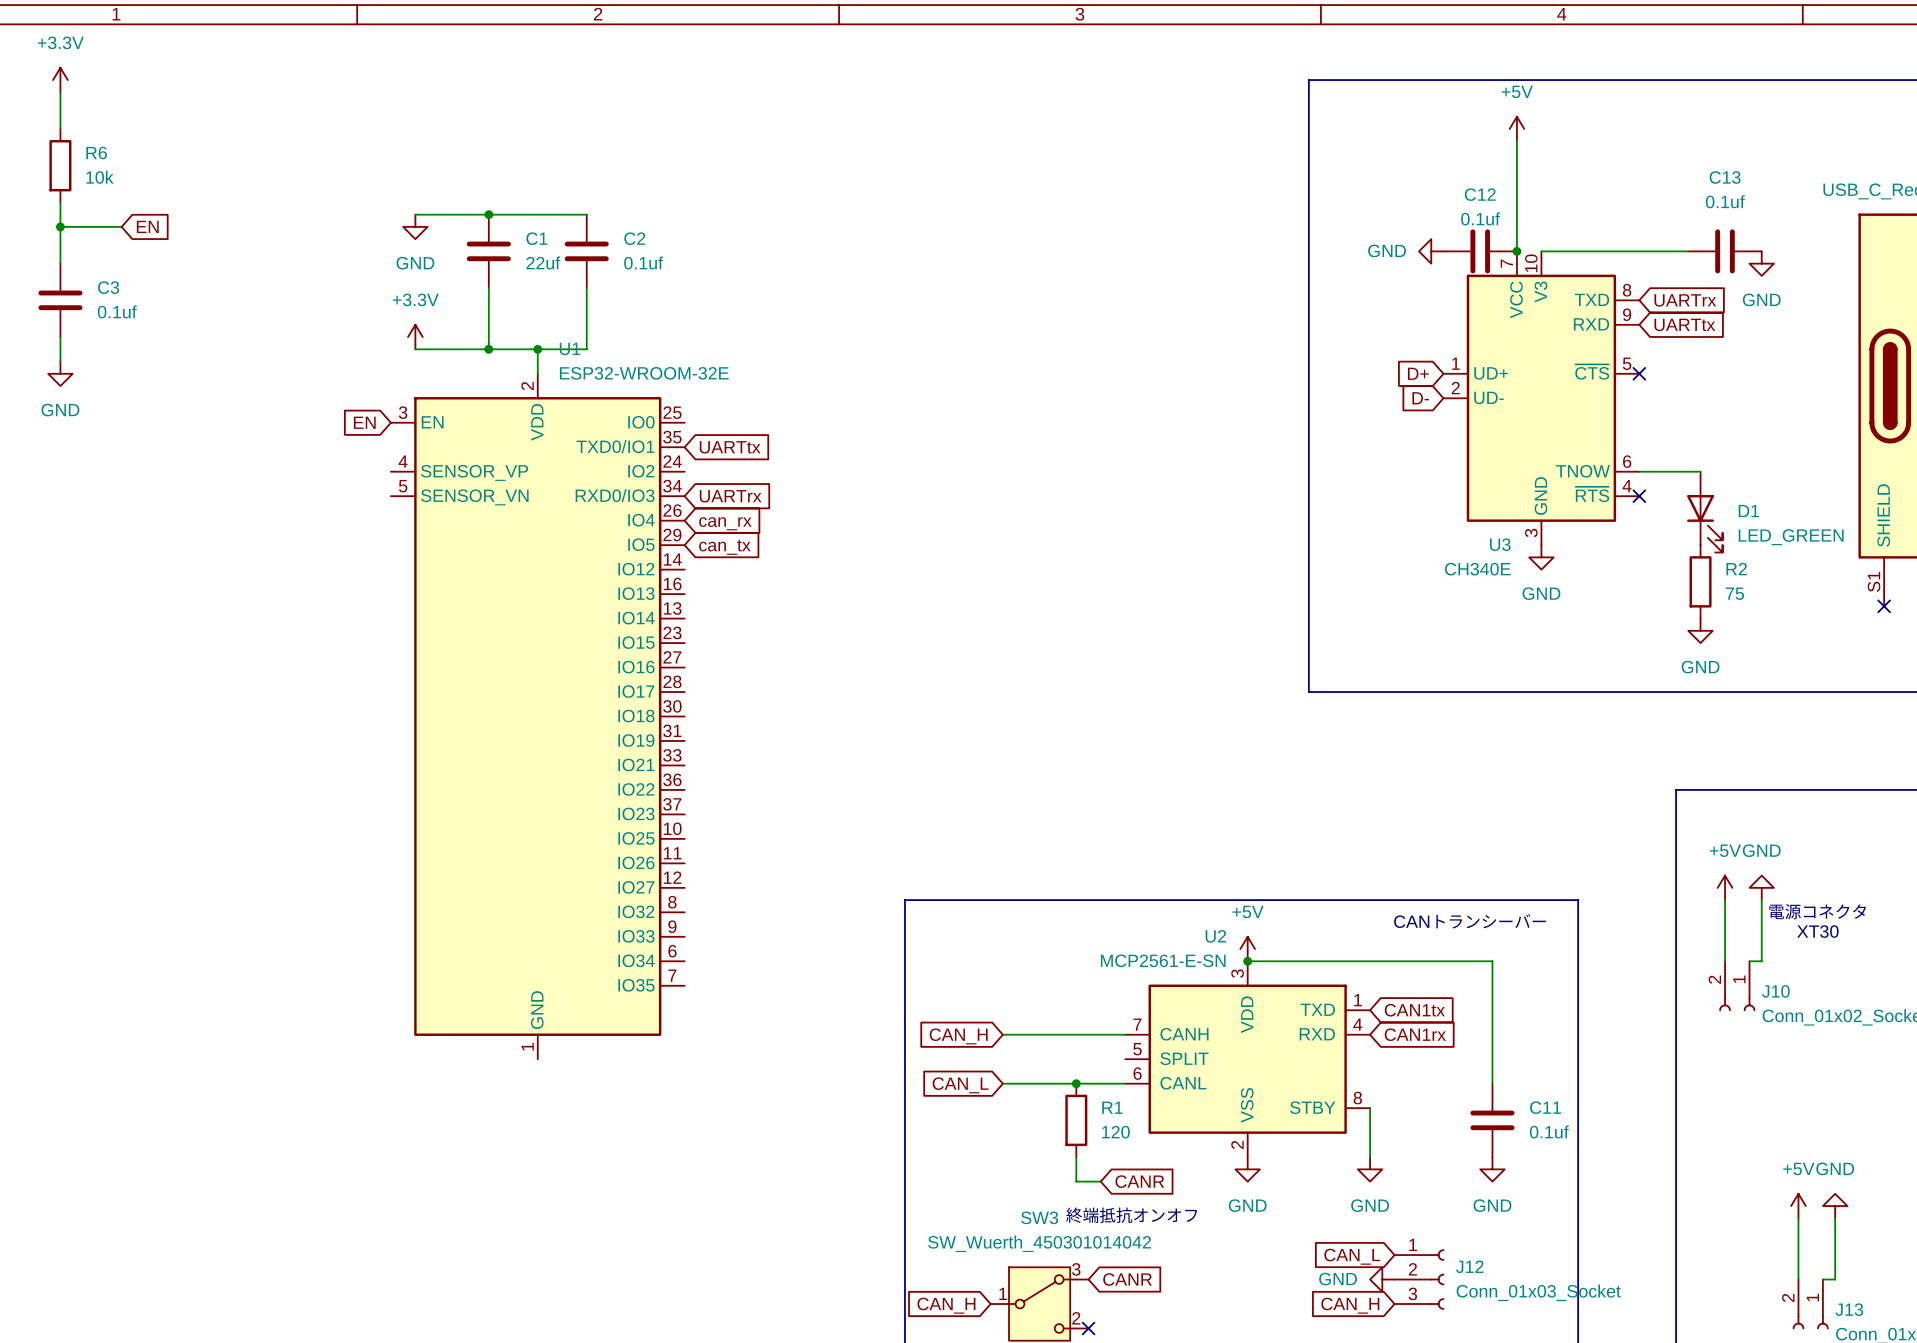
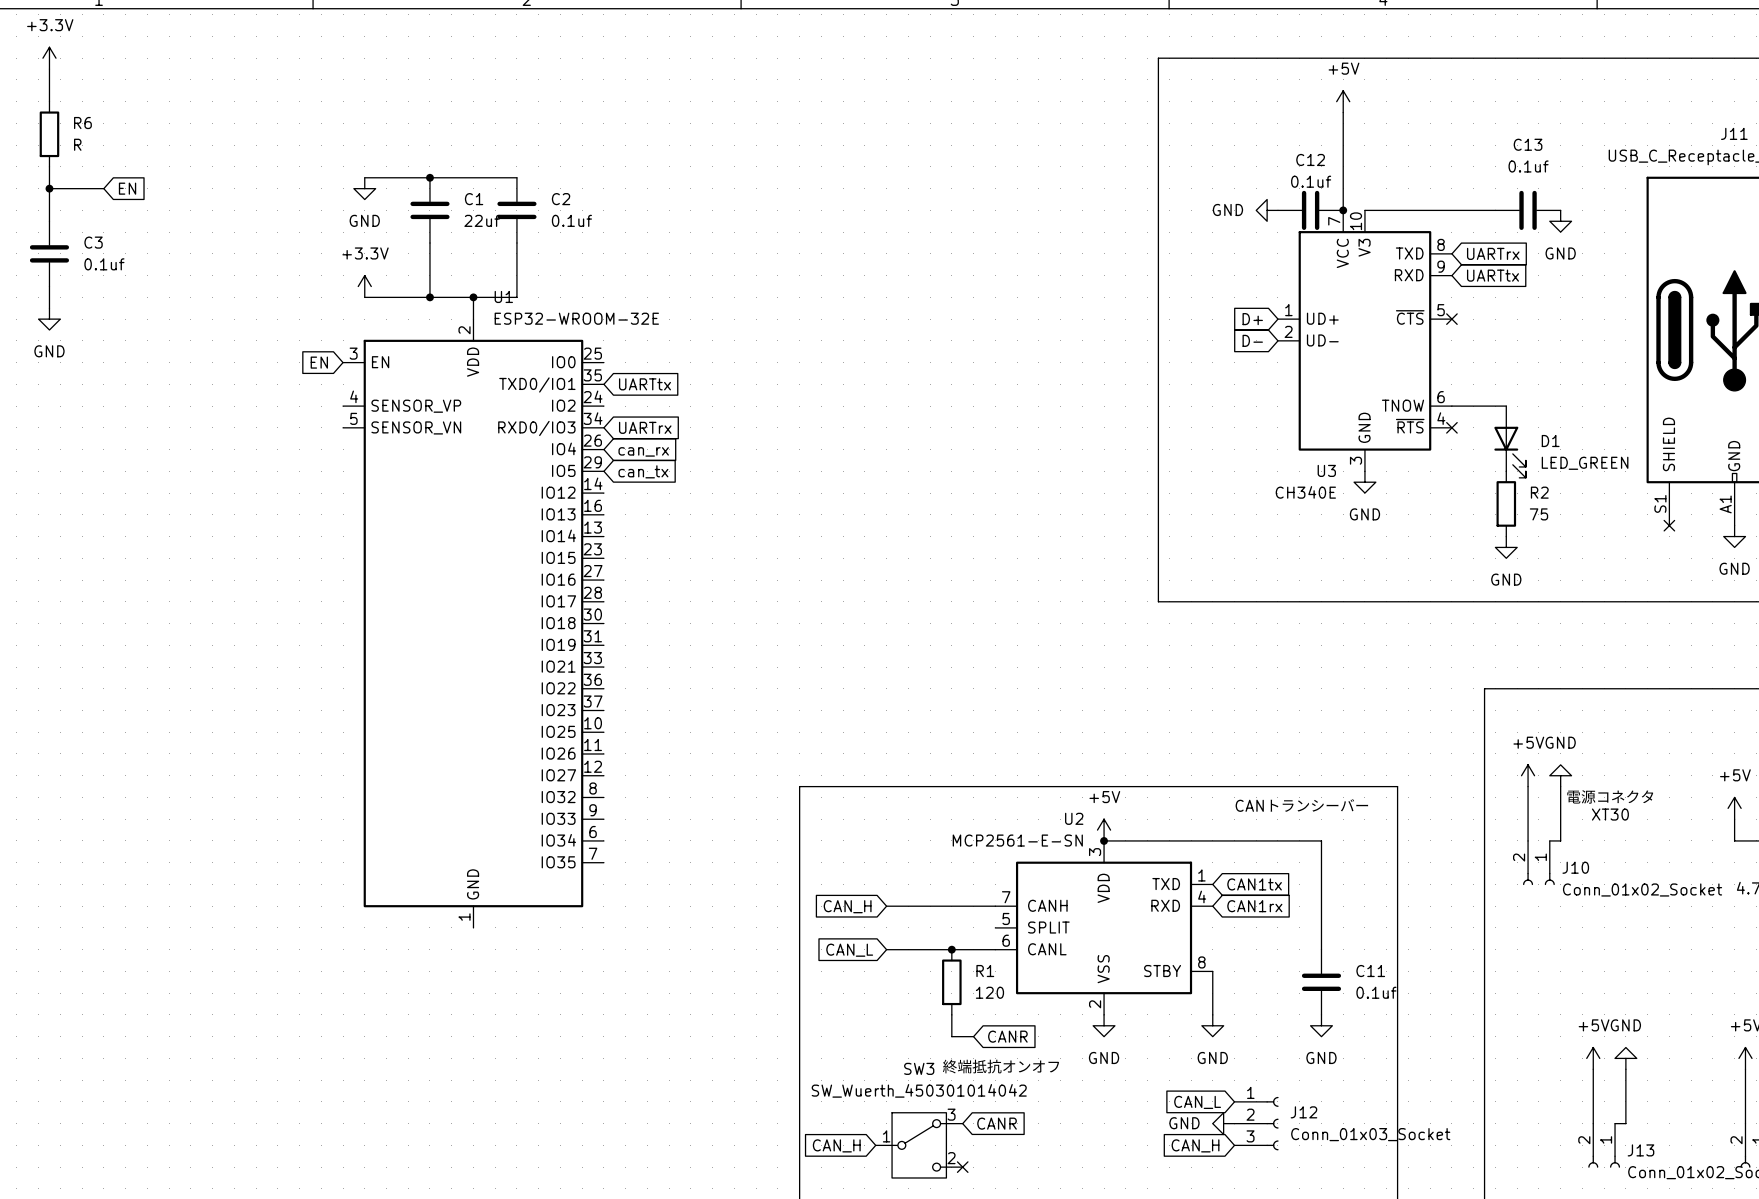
R6 value: 10k (99, 177) -> R (77, 144)

